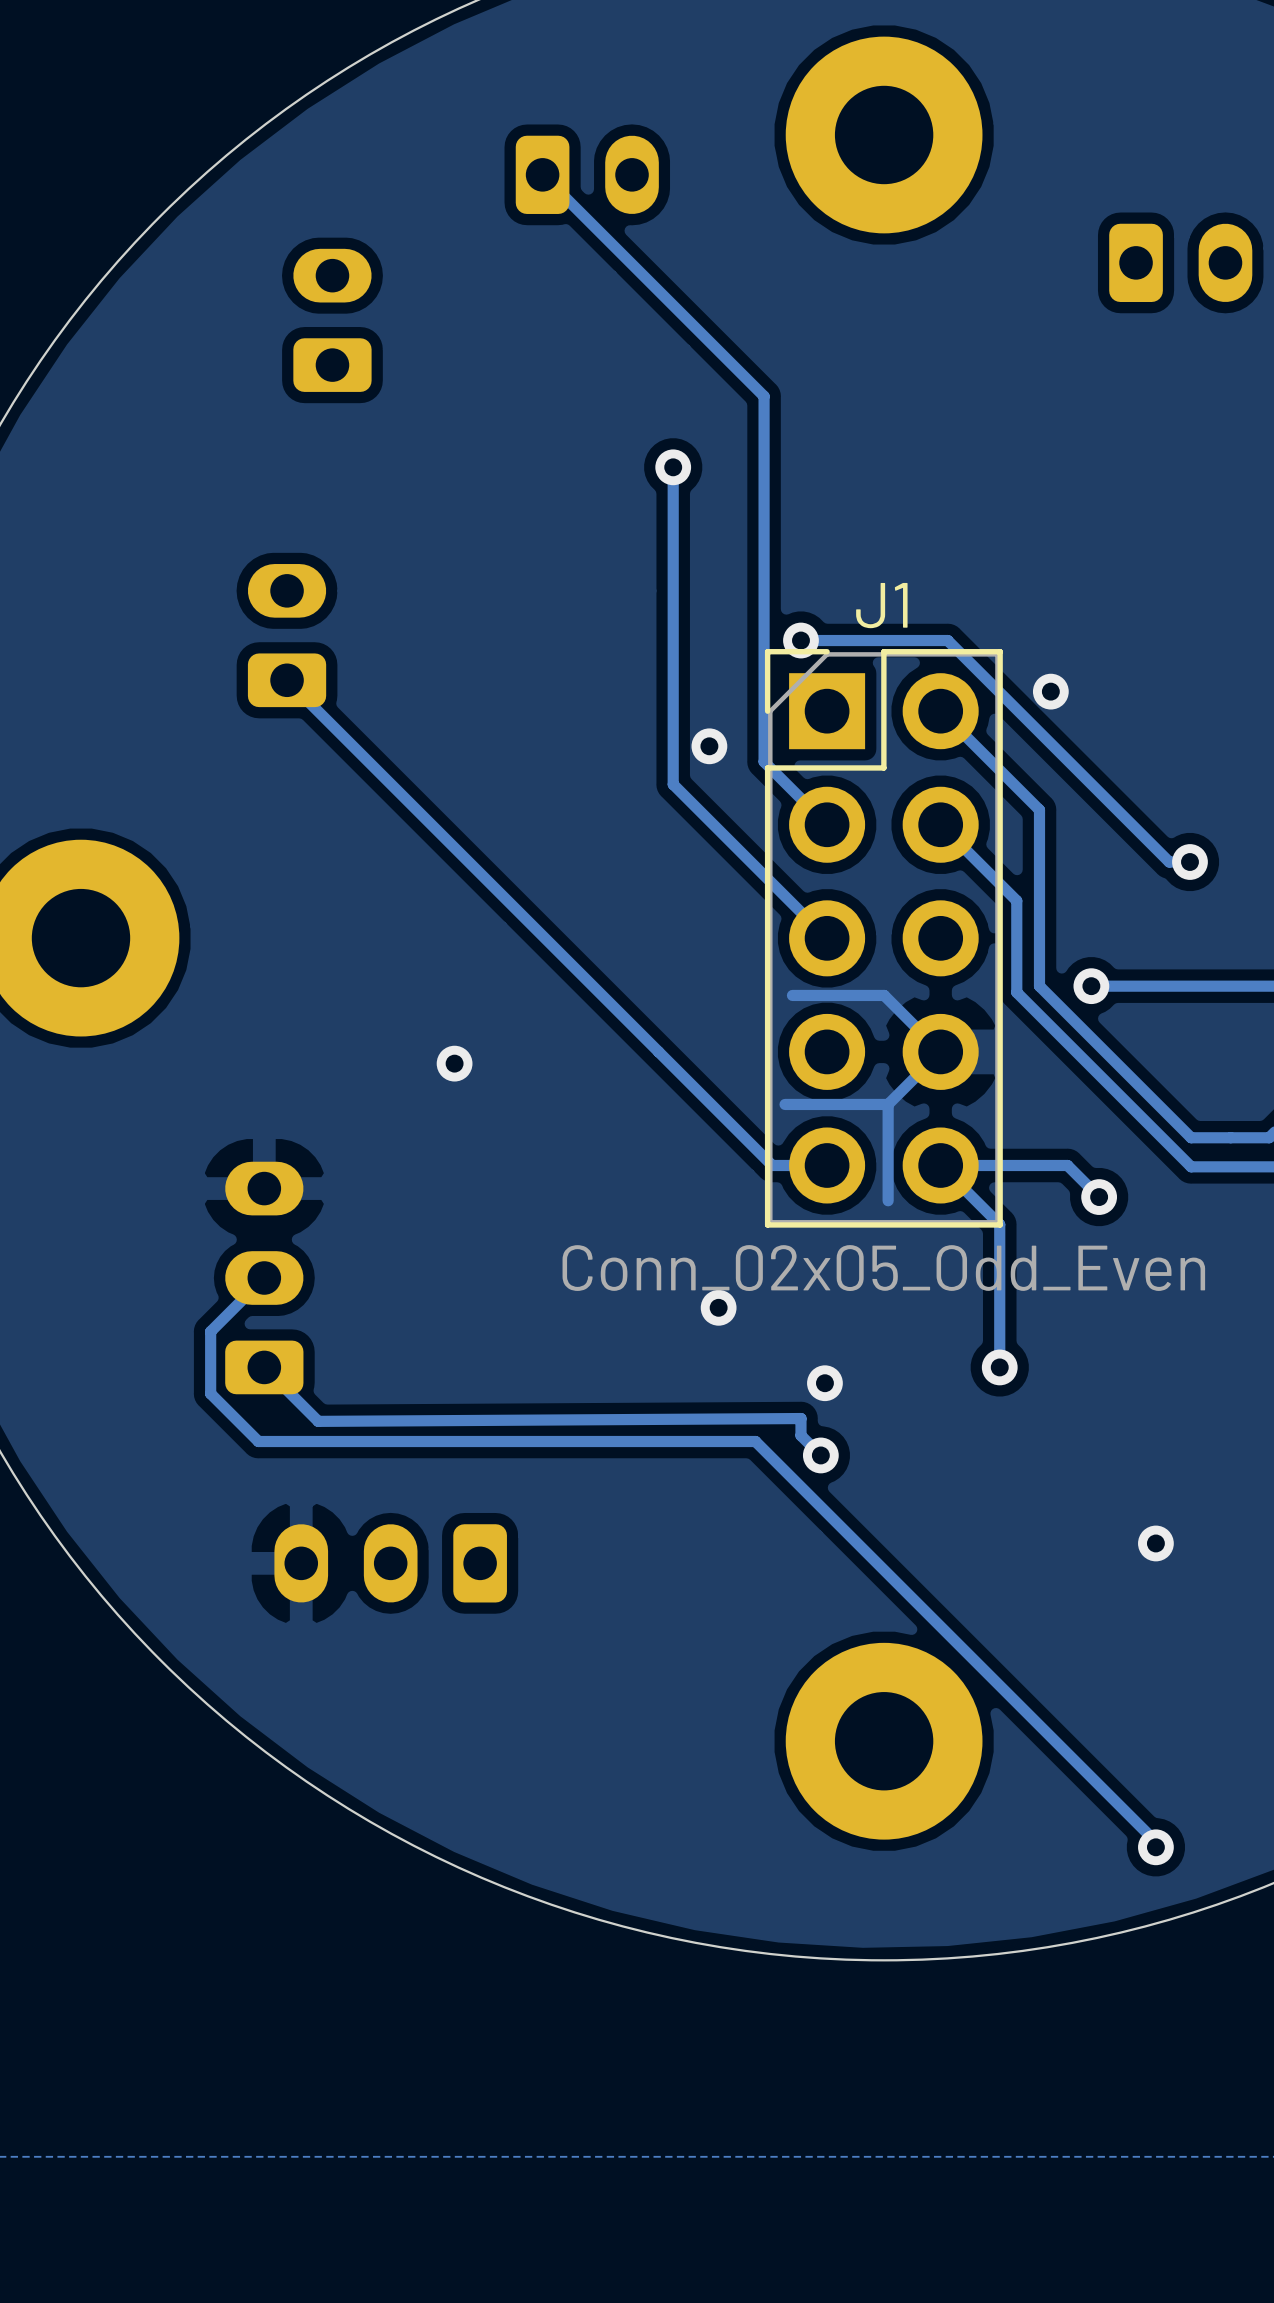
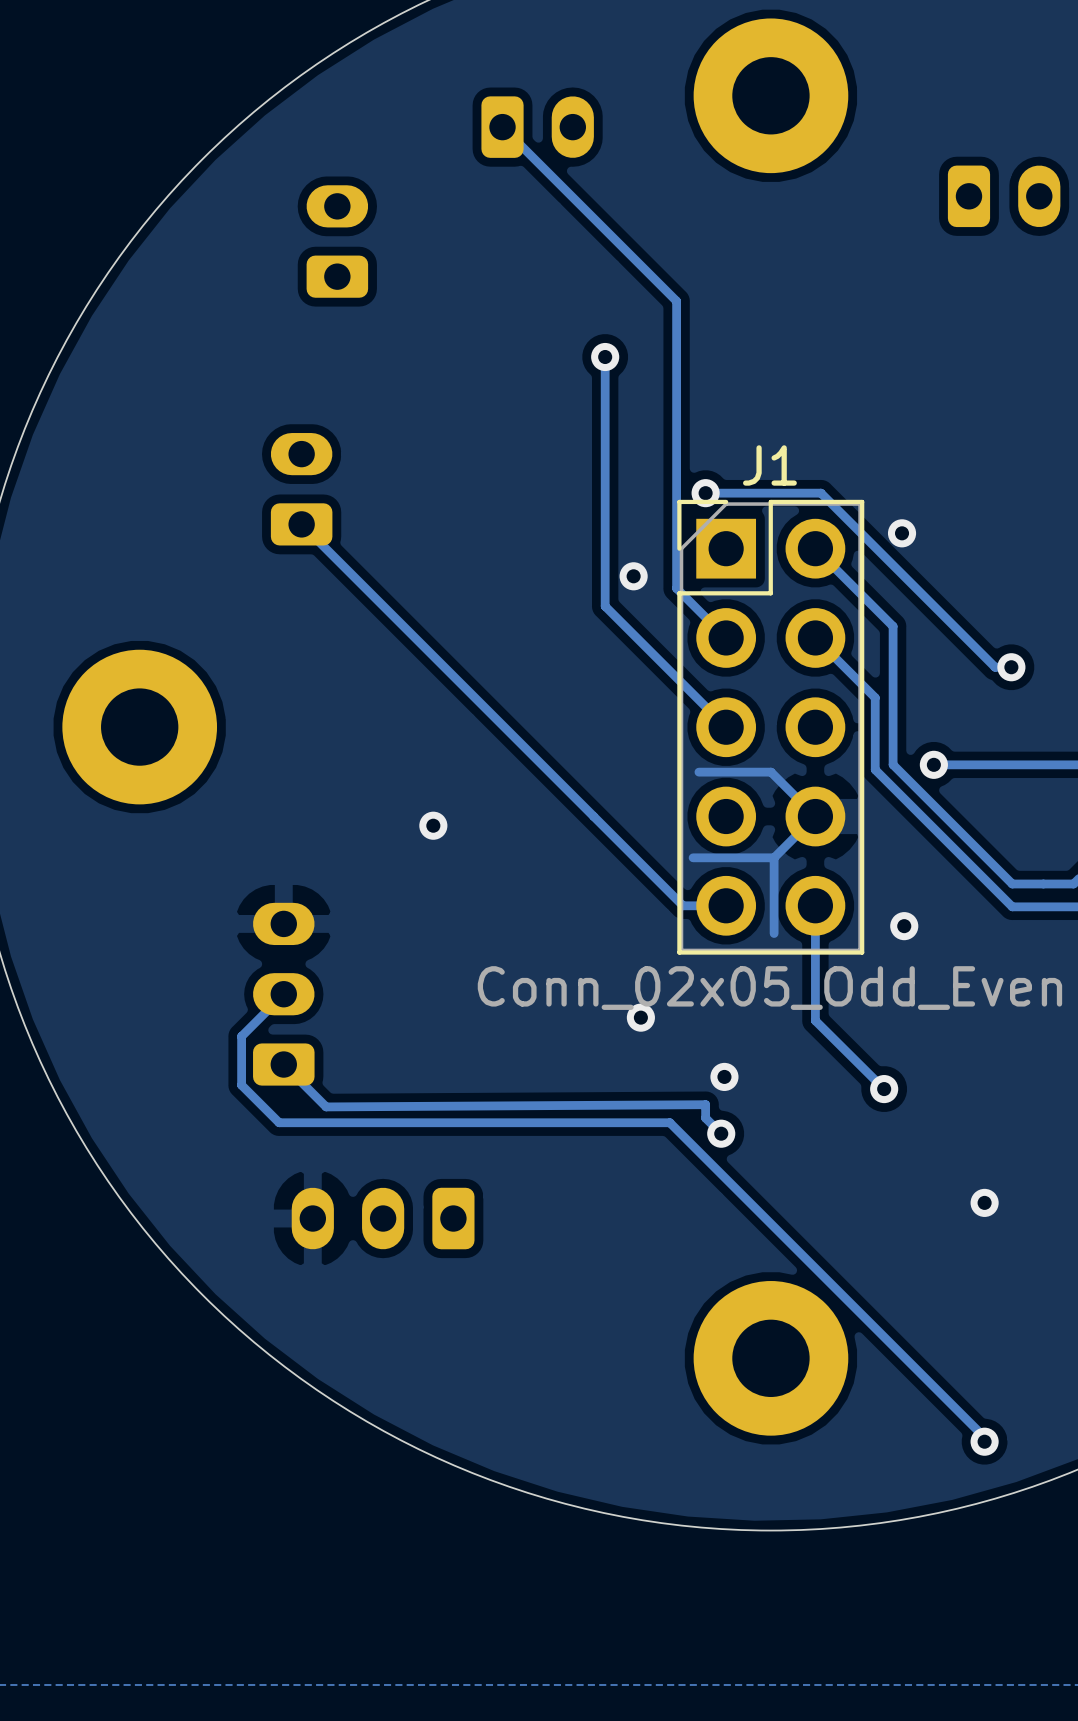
track: none -> (815, 905) (815, 1020) (884, 1089)
track: (1099, 1197) (1067, 1165) (940, 1165) (999, 1224) (999, 1367) -> none
via position: (1099, 1197) -> (904, 926)
via position: (999, 1367) -> (884, 1089)

